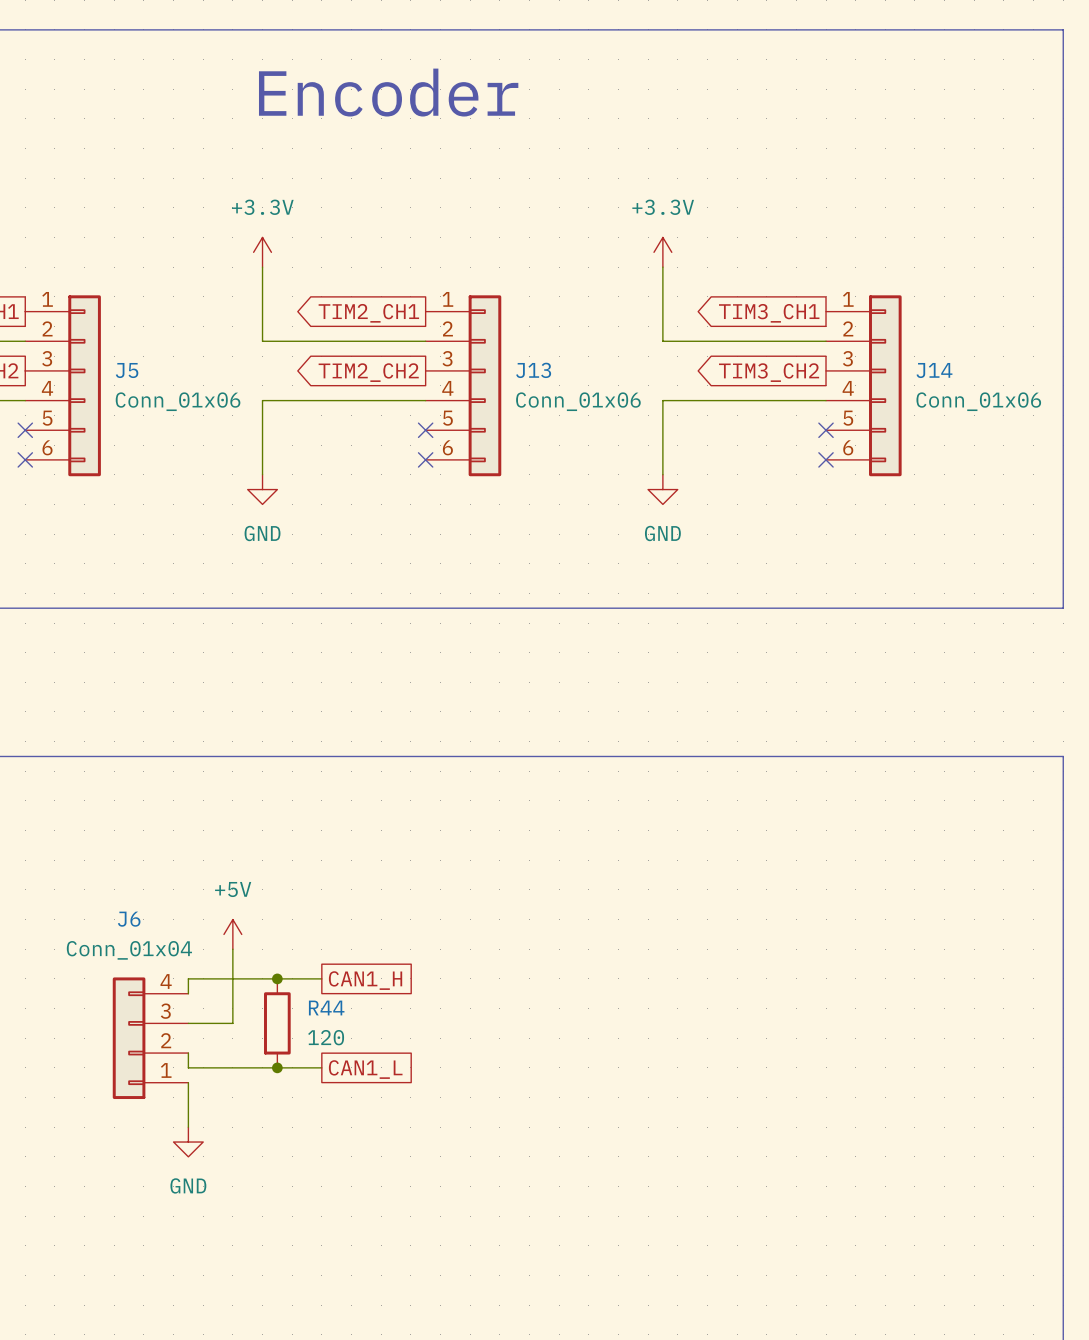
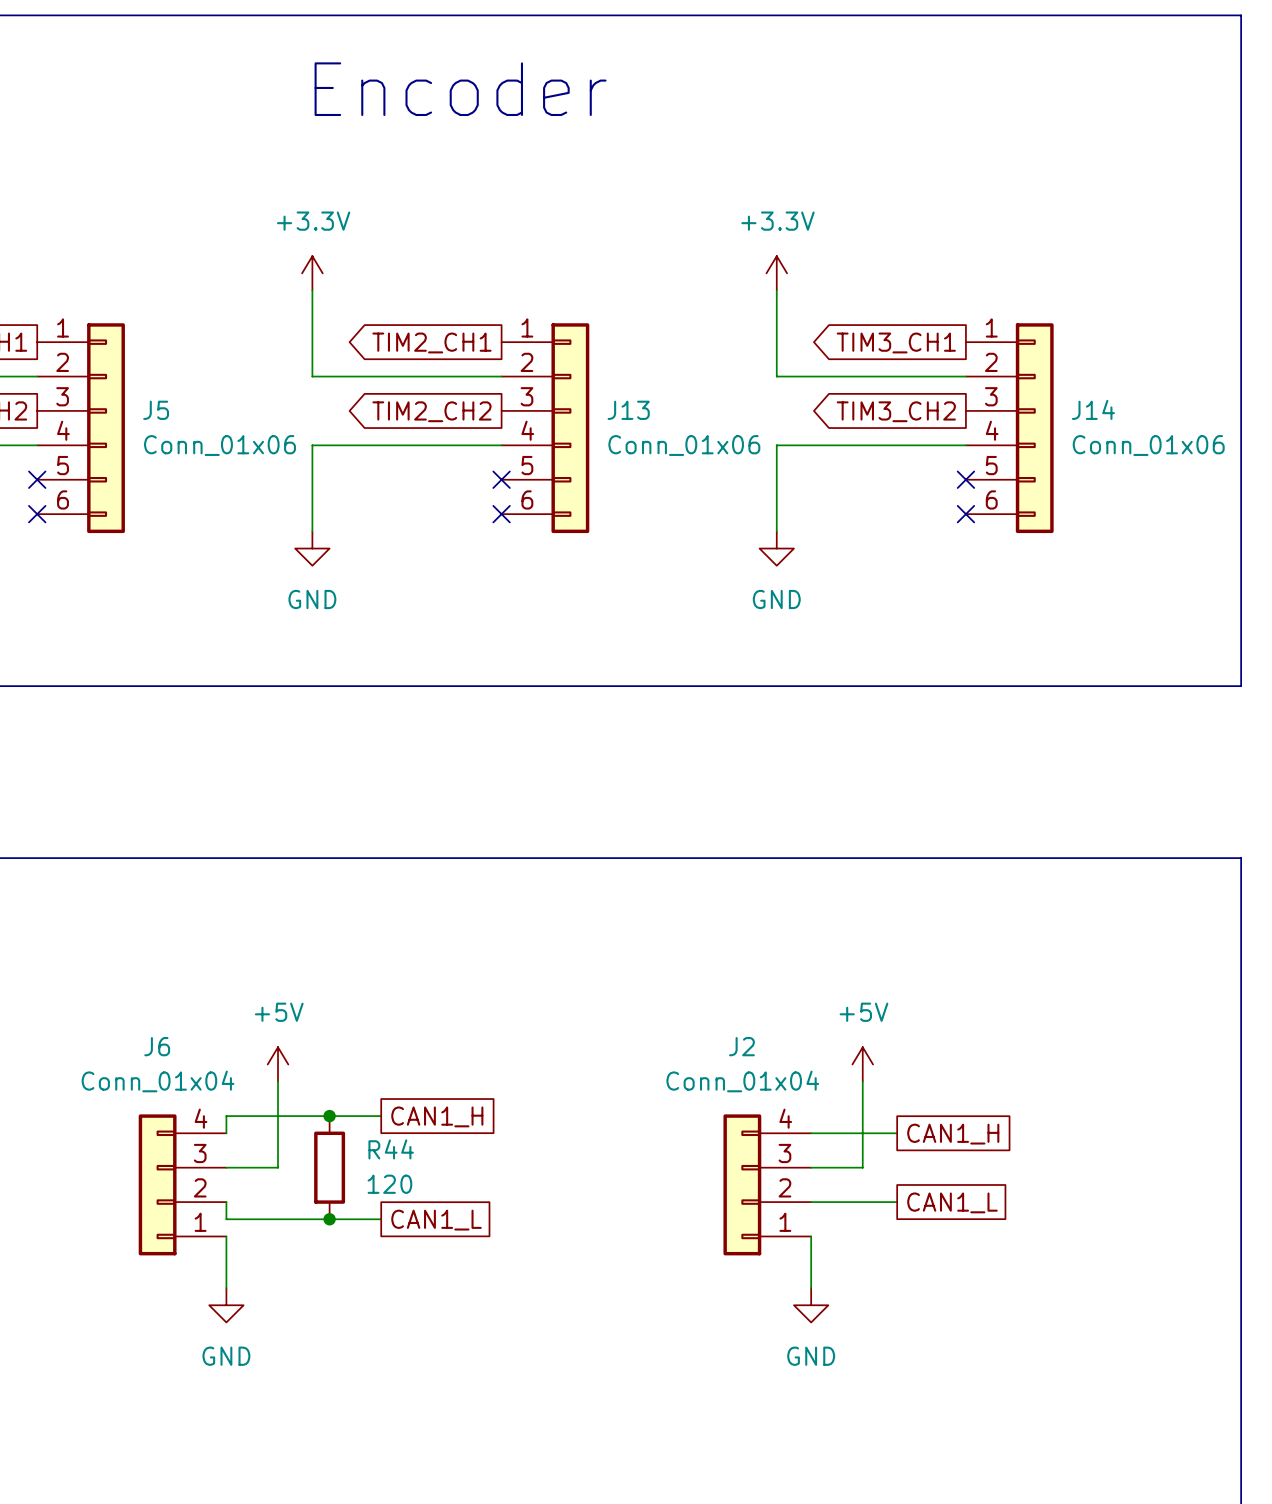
power symbol: none -> +5V (862, 1064)
wire: none -> (862, 1081) (862, 1167) (811, 1167)
wire: none -> (811, 1133) (897, 1133)
global label: none -> CAN1_H (953, 1134)
J2: none -> Conn_01x04 (767, 1184)
wire: none -> (811, 1202) (897, 1202)
global label: none -> CAN1_L (952, 1202)
wire: none -> (811, 1236) (811, 1288)
power symbol: none -> GND (811, 1305)

